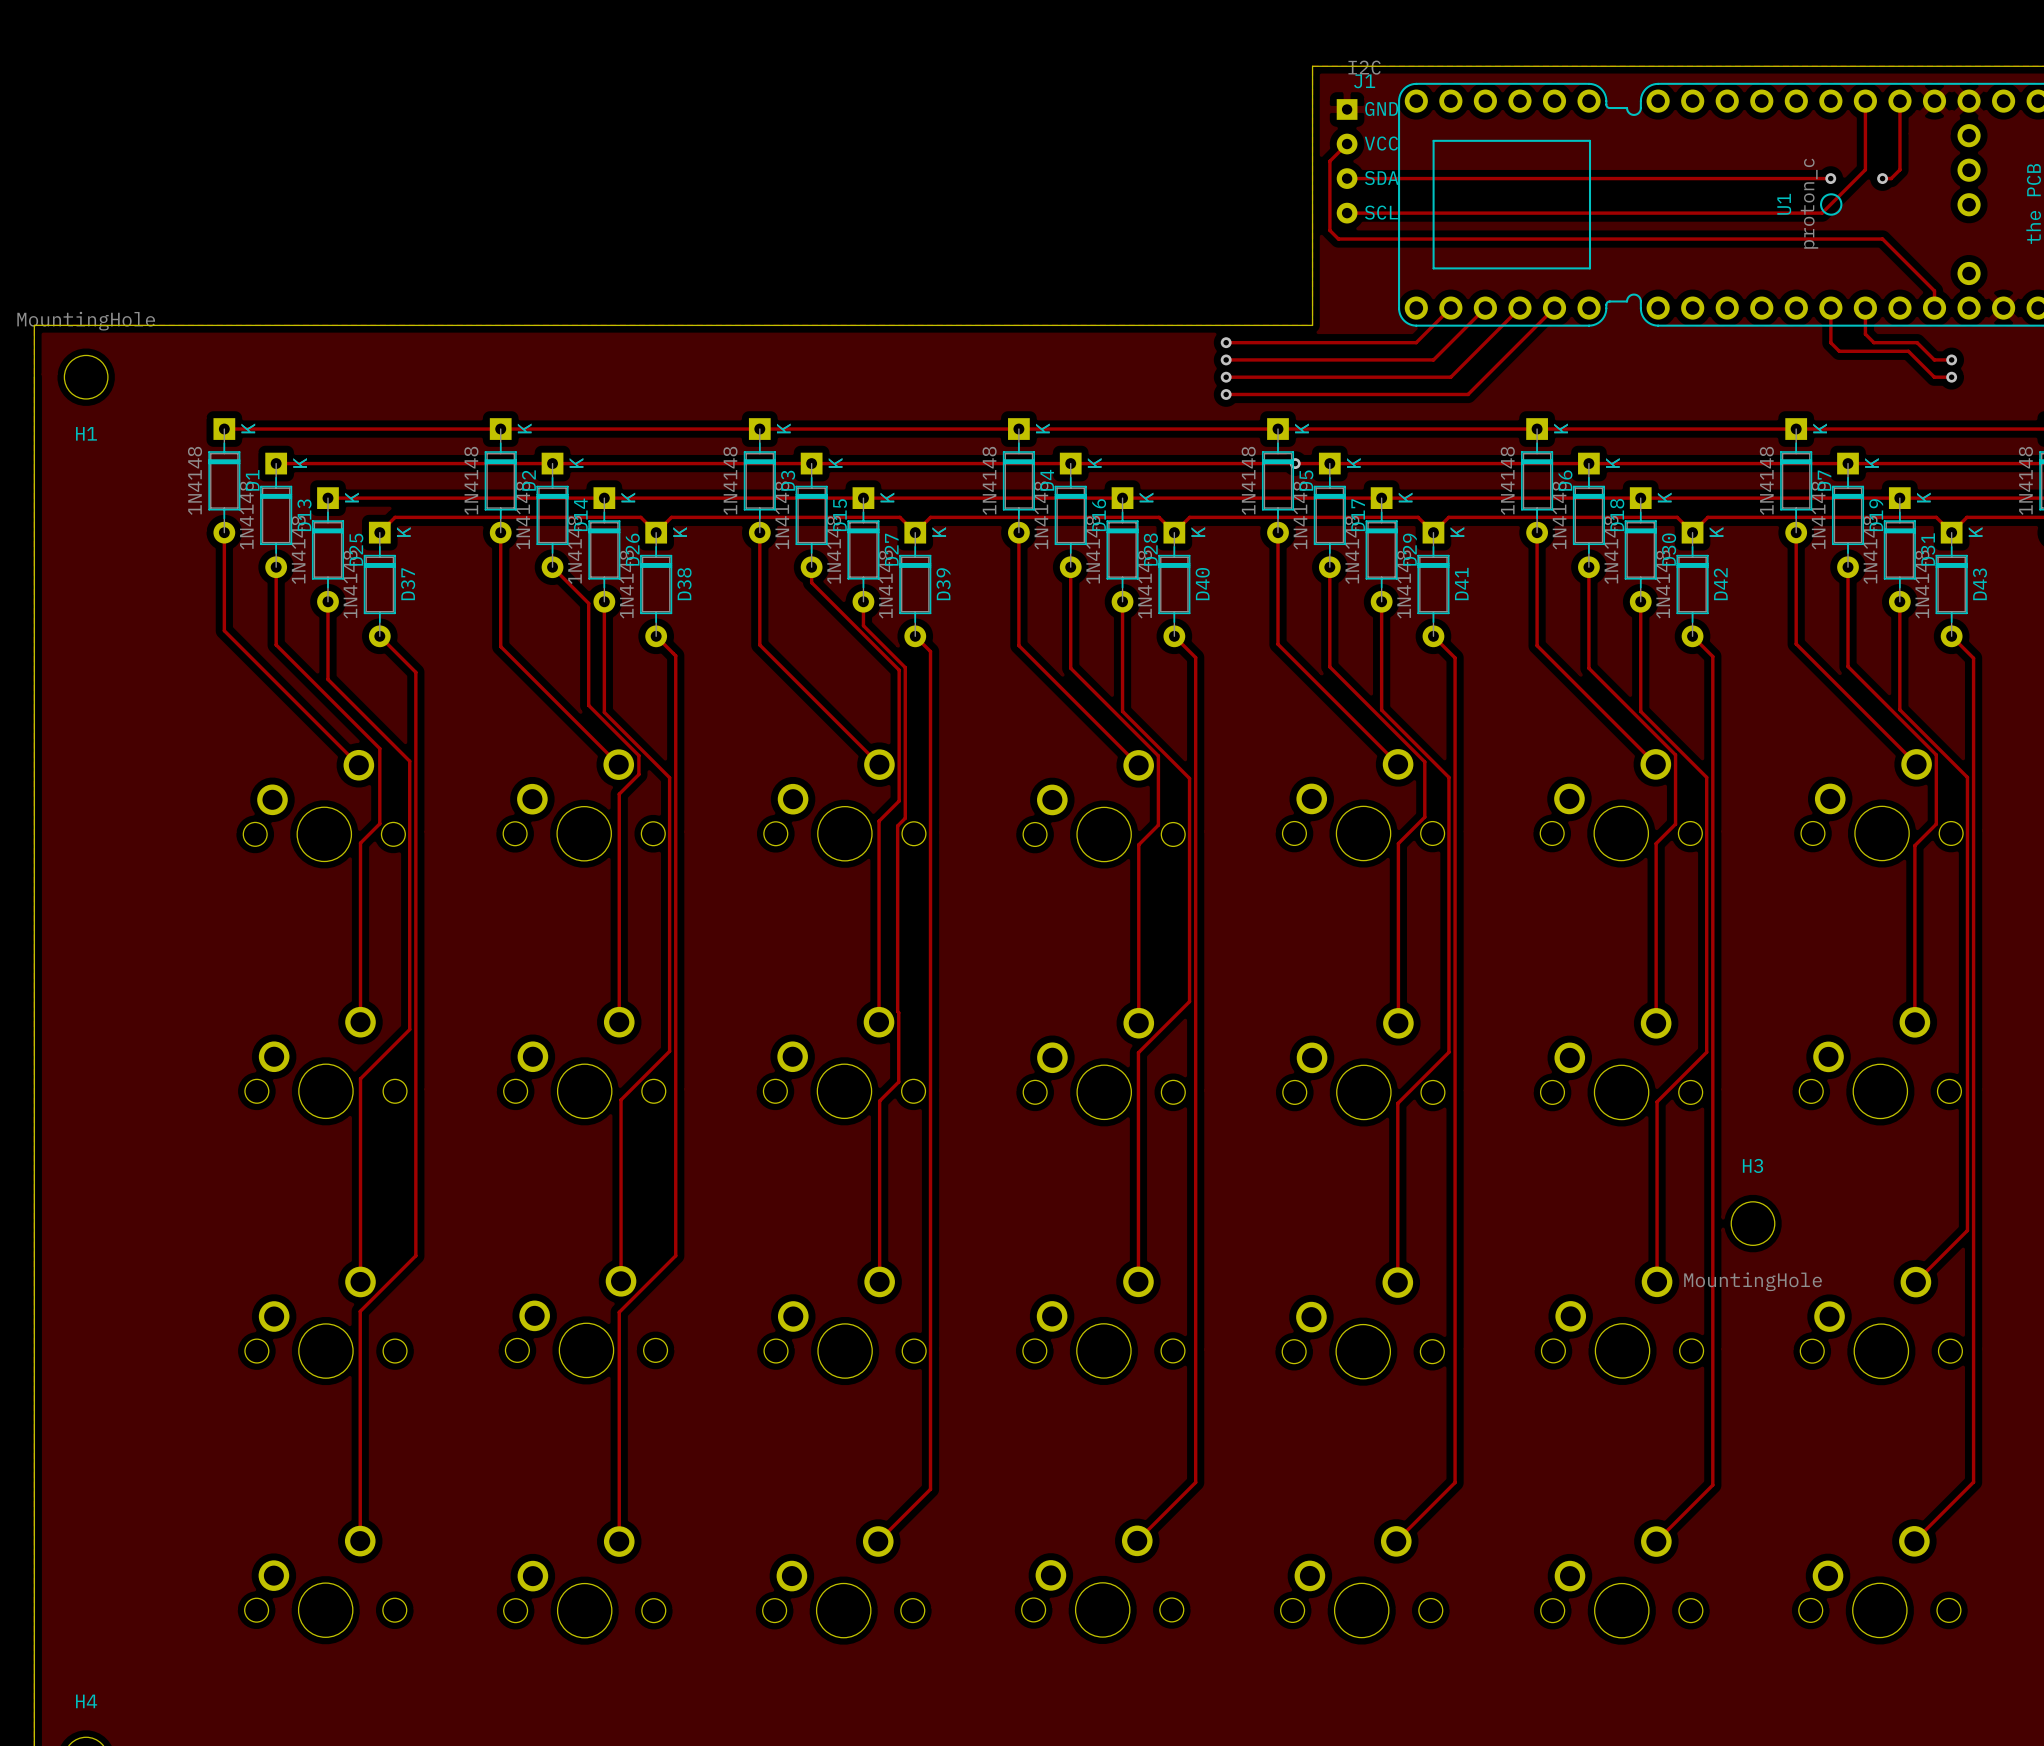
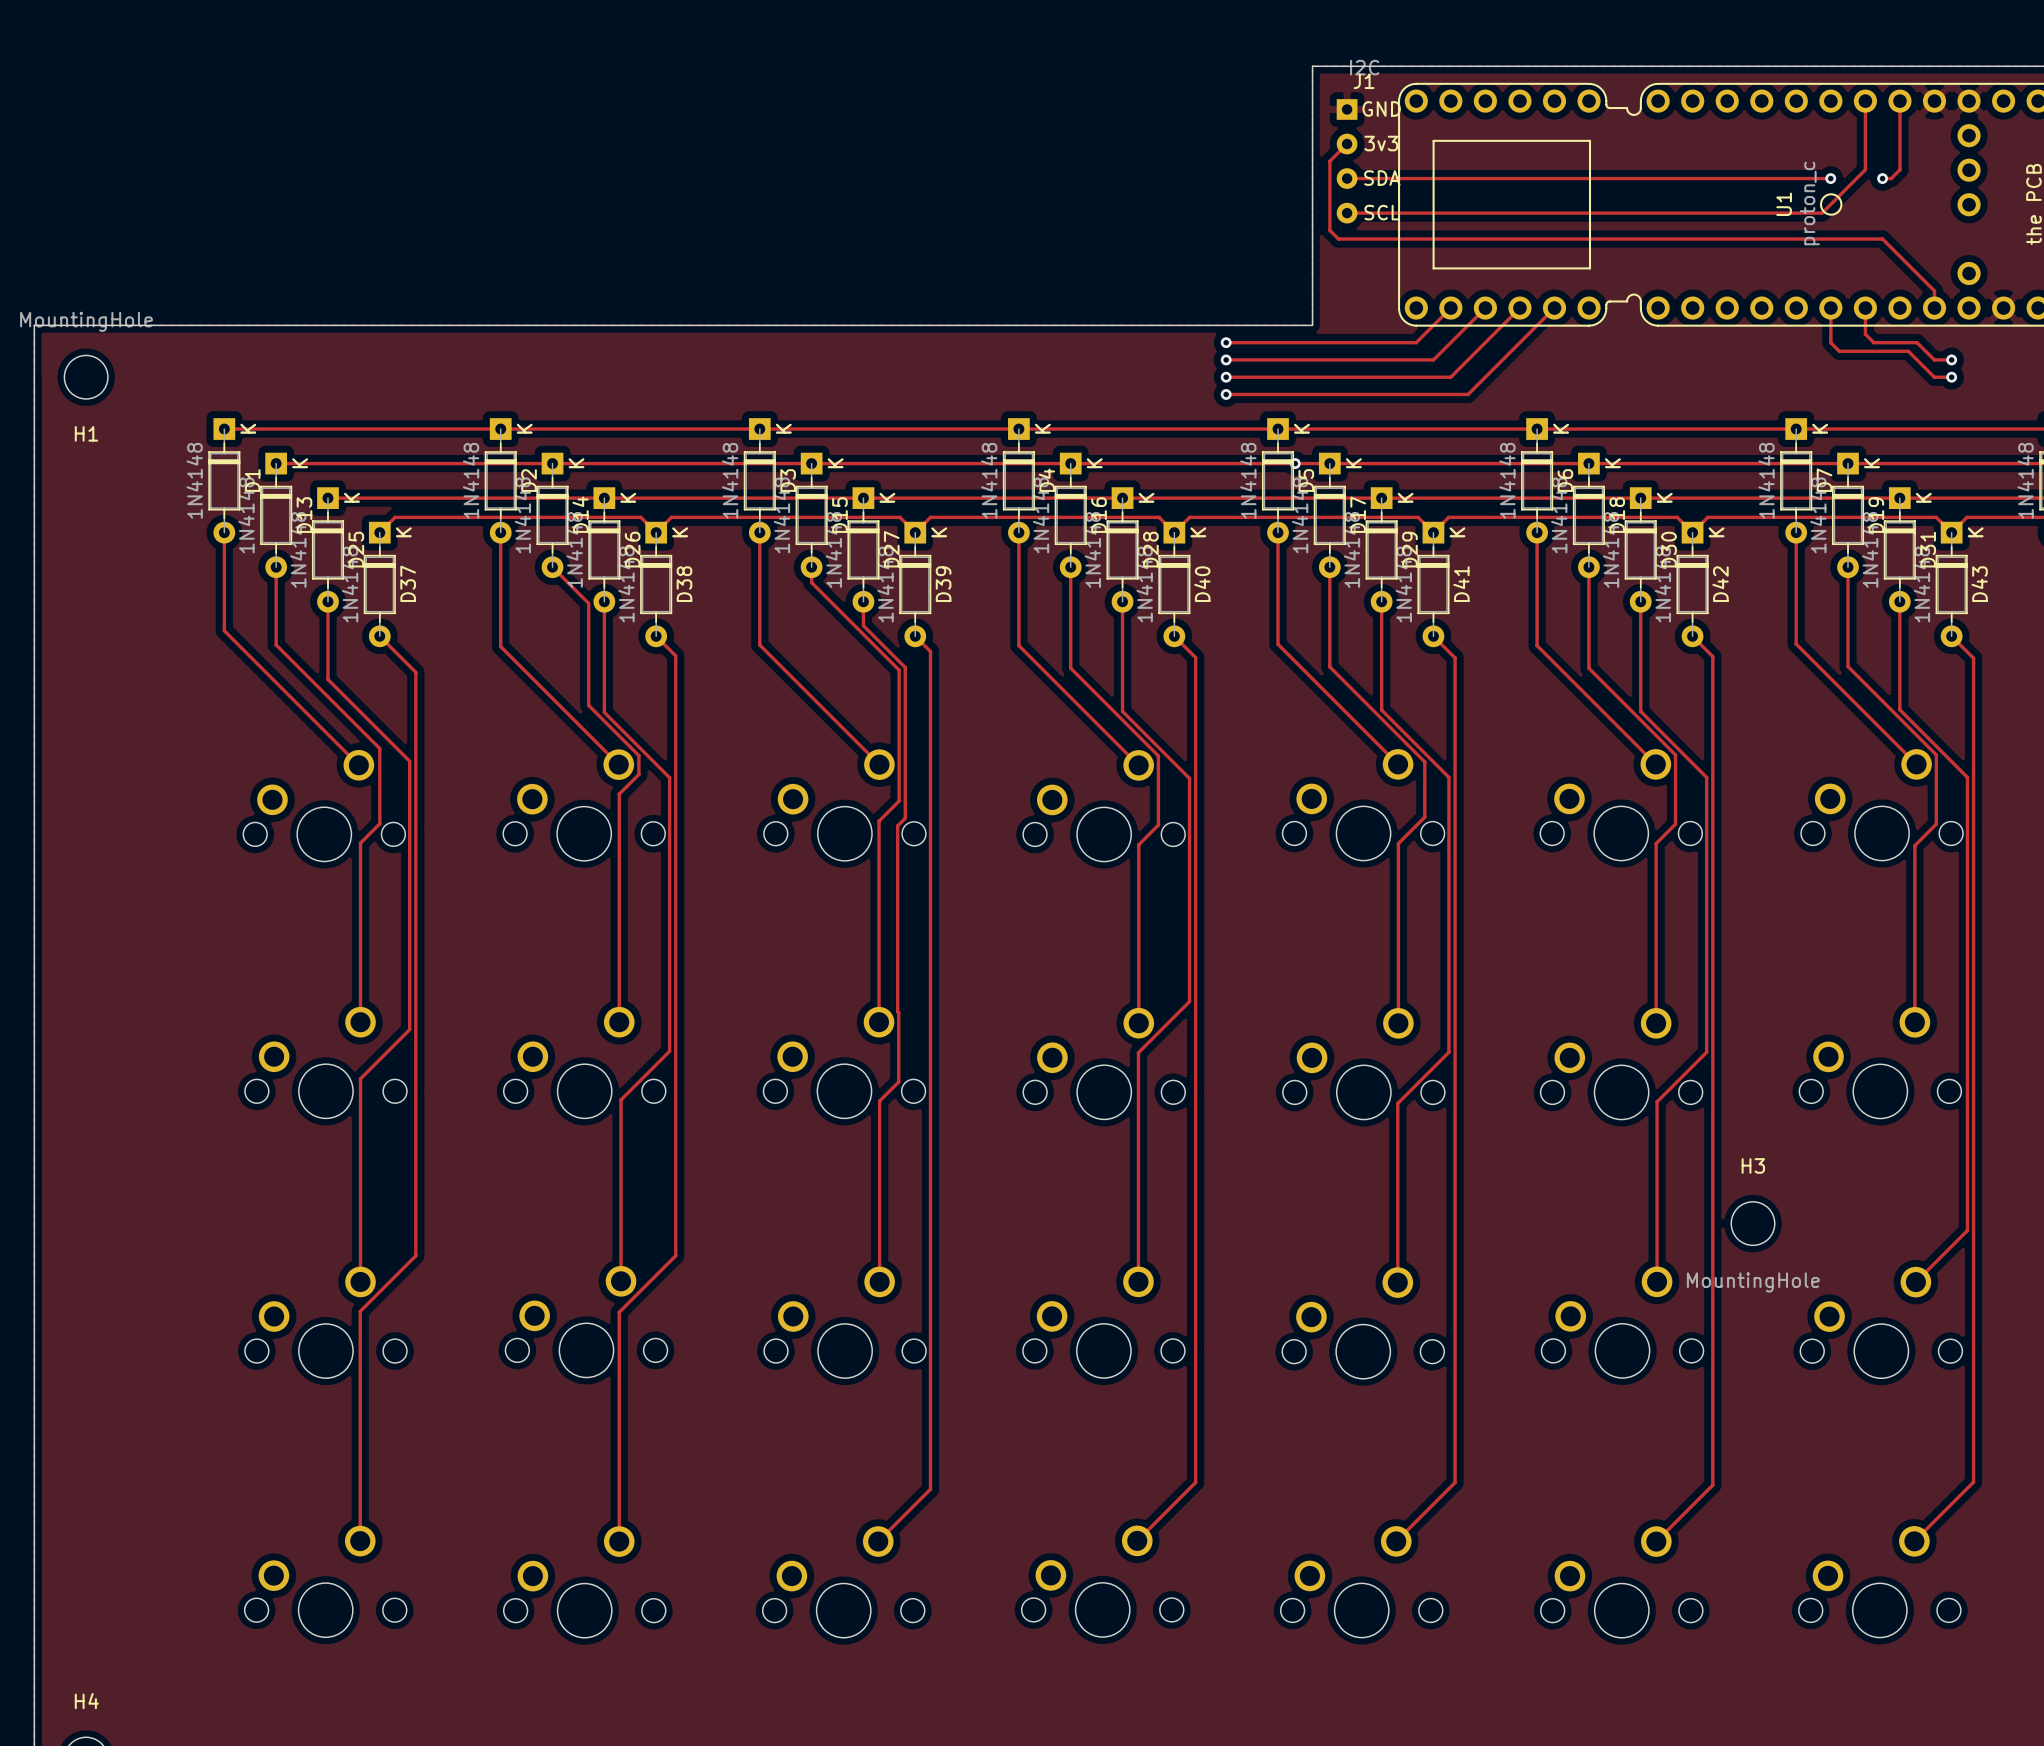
J1 text: VCC (1381, 143) -> 3v3 (1381, 143)

